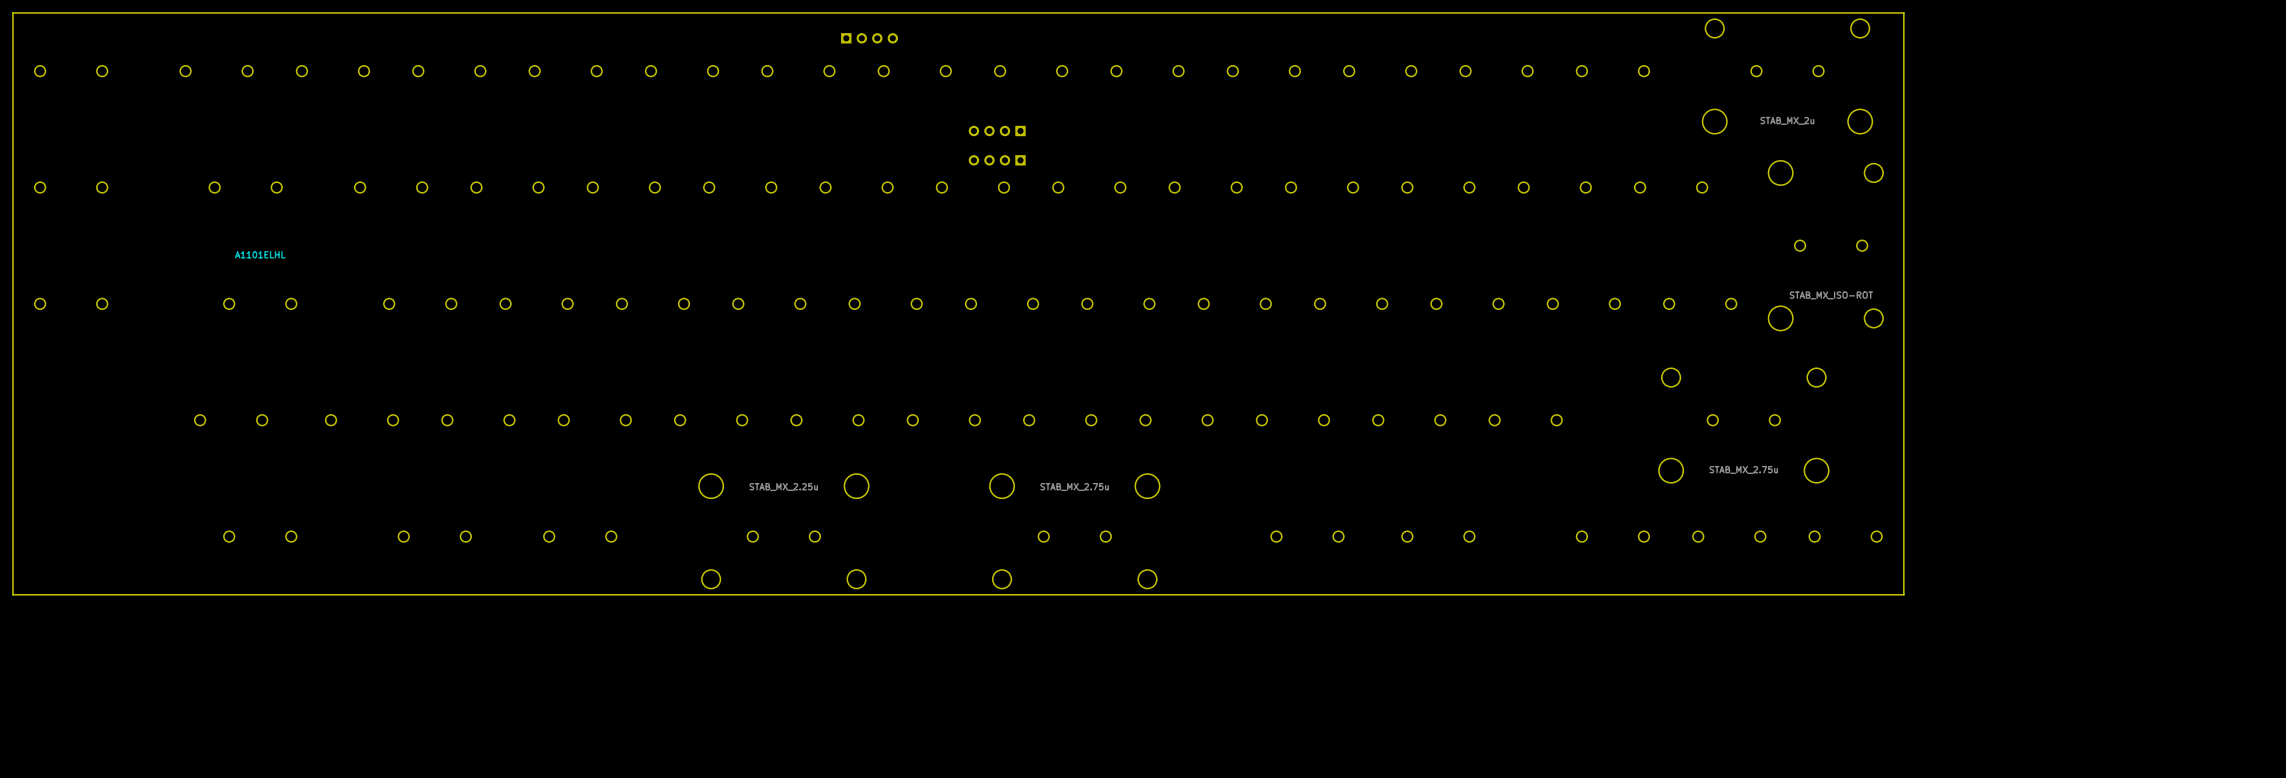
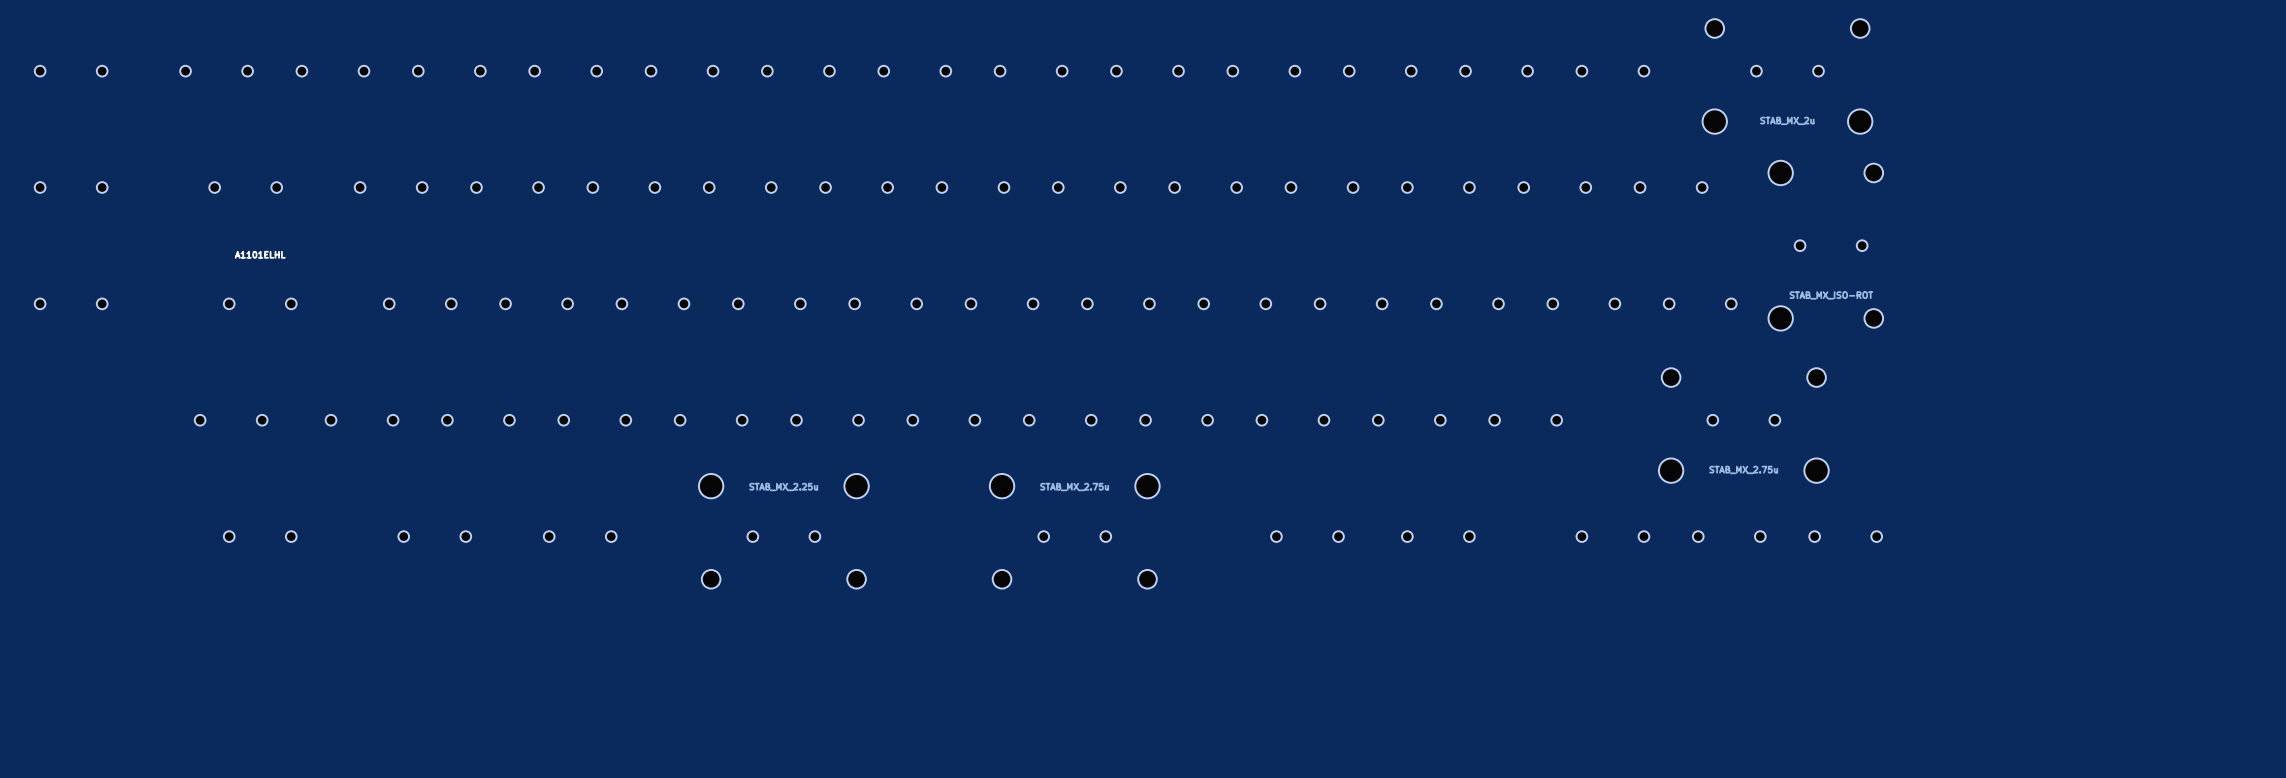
board edge: (12, 12) (1903, 12) (1903, 594) (12, 594) (12, 12) -> none
part: (869, 38) -> none
part: (997, 131) -> none
part: (997, 160) -> none

